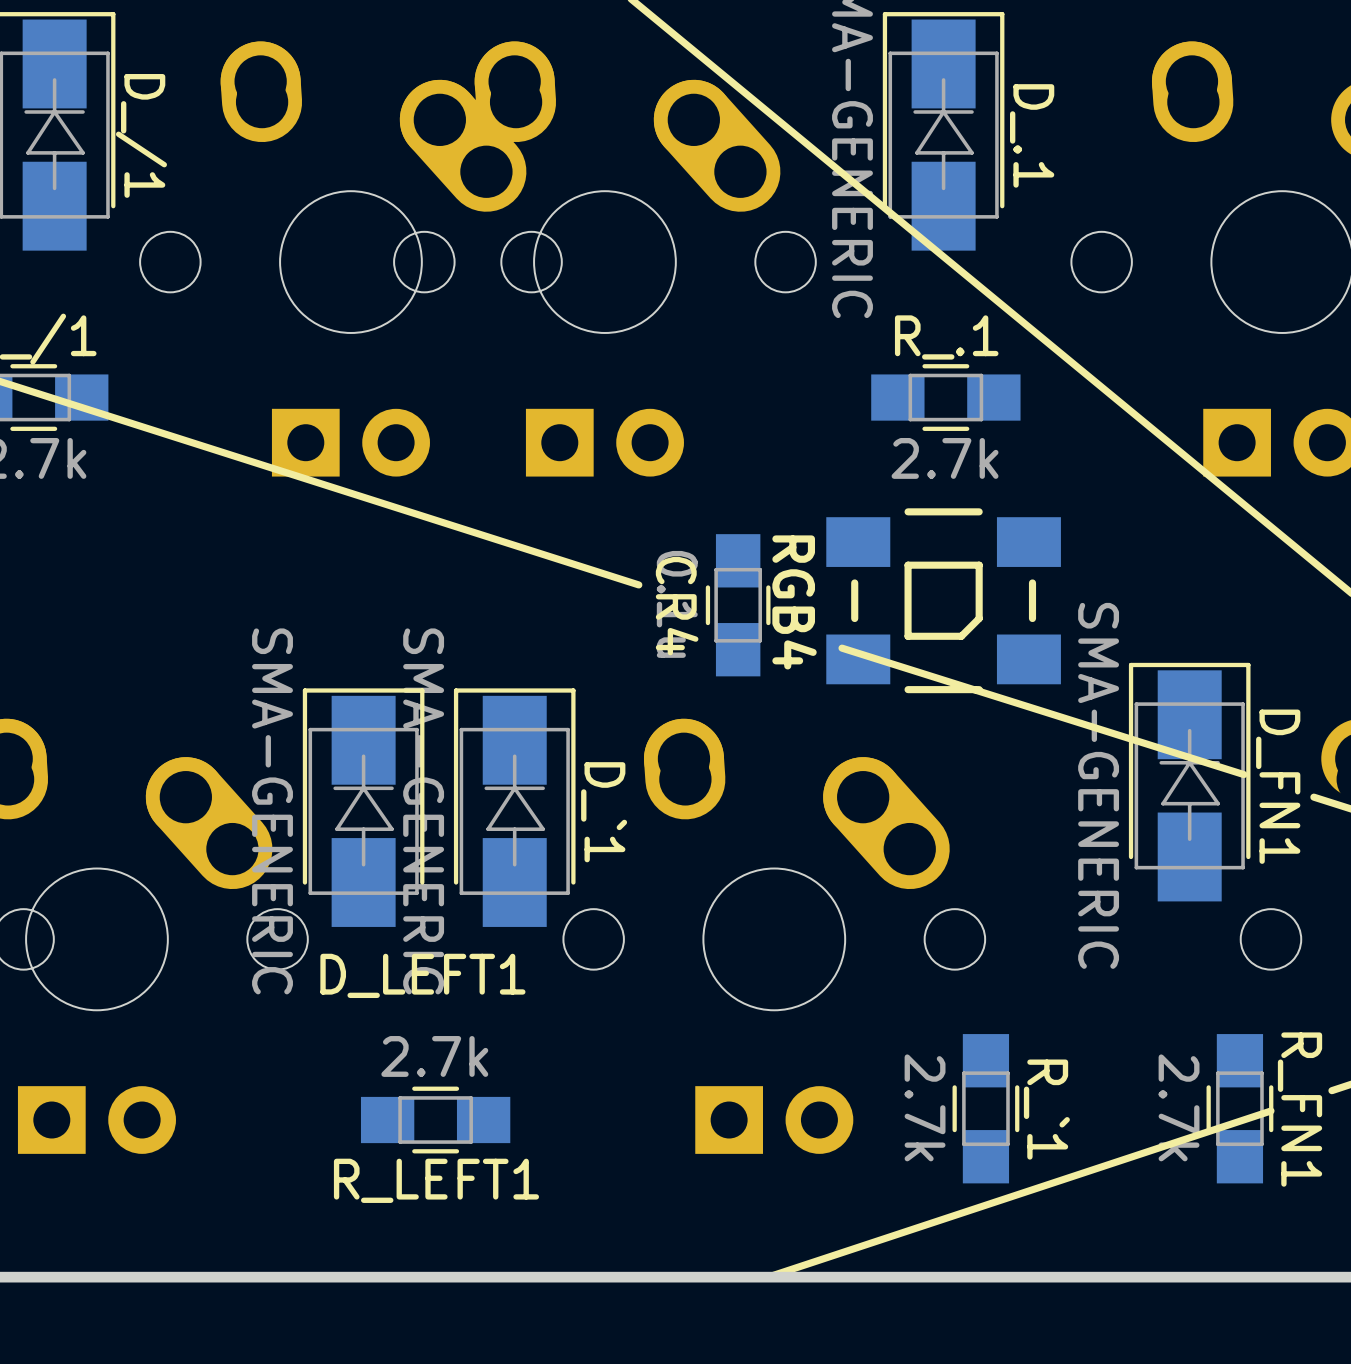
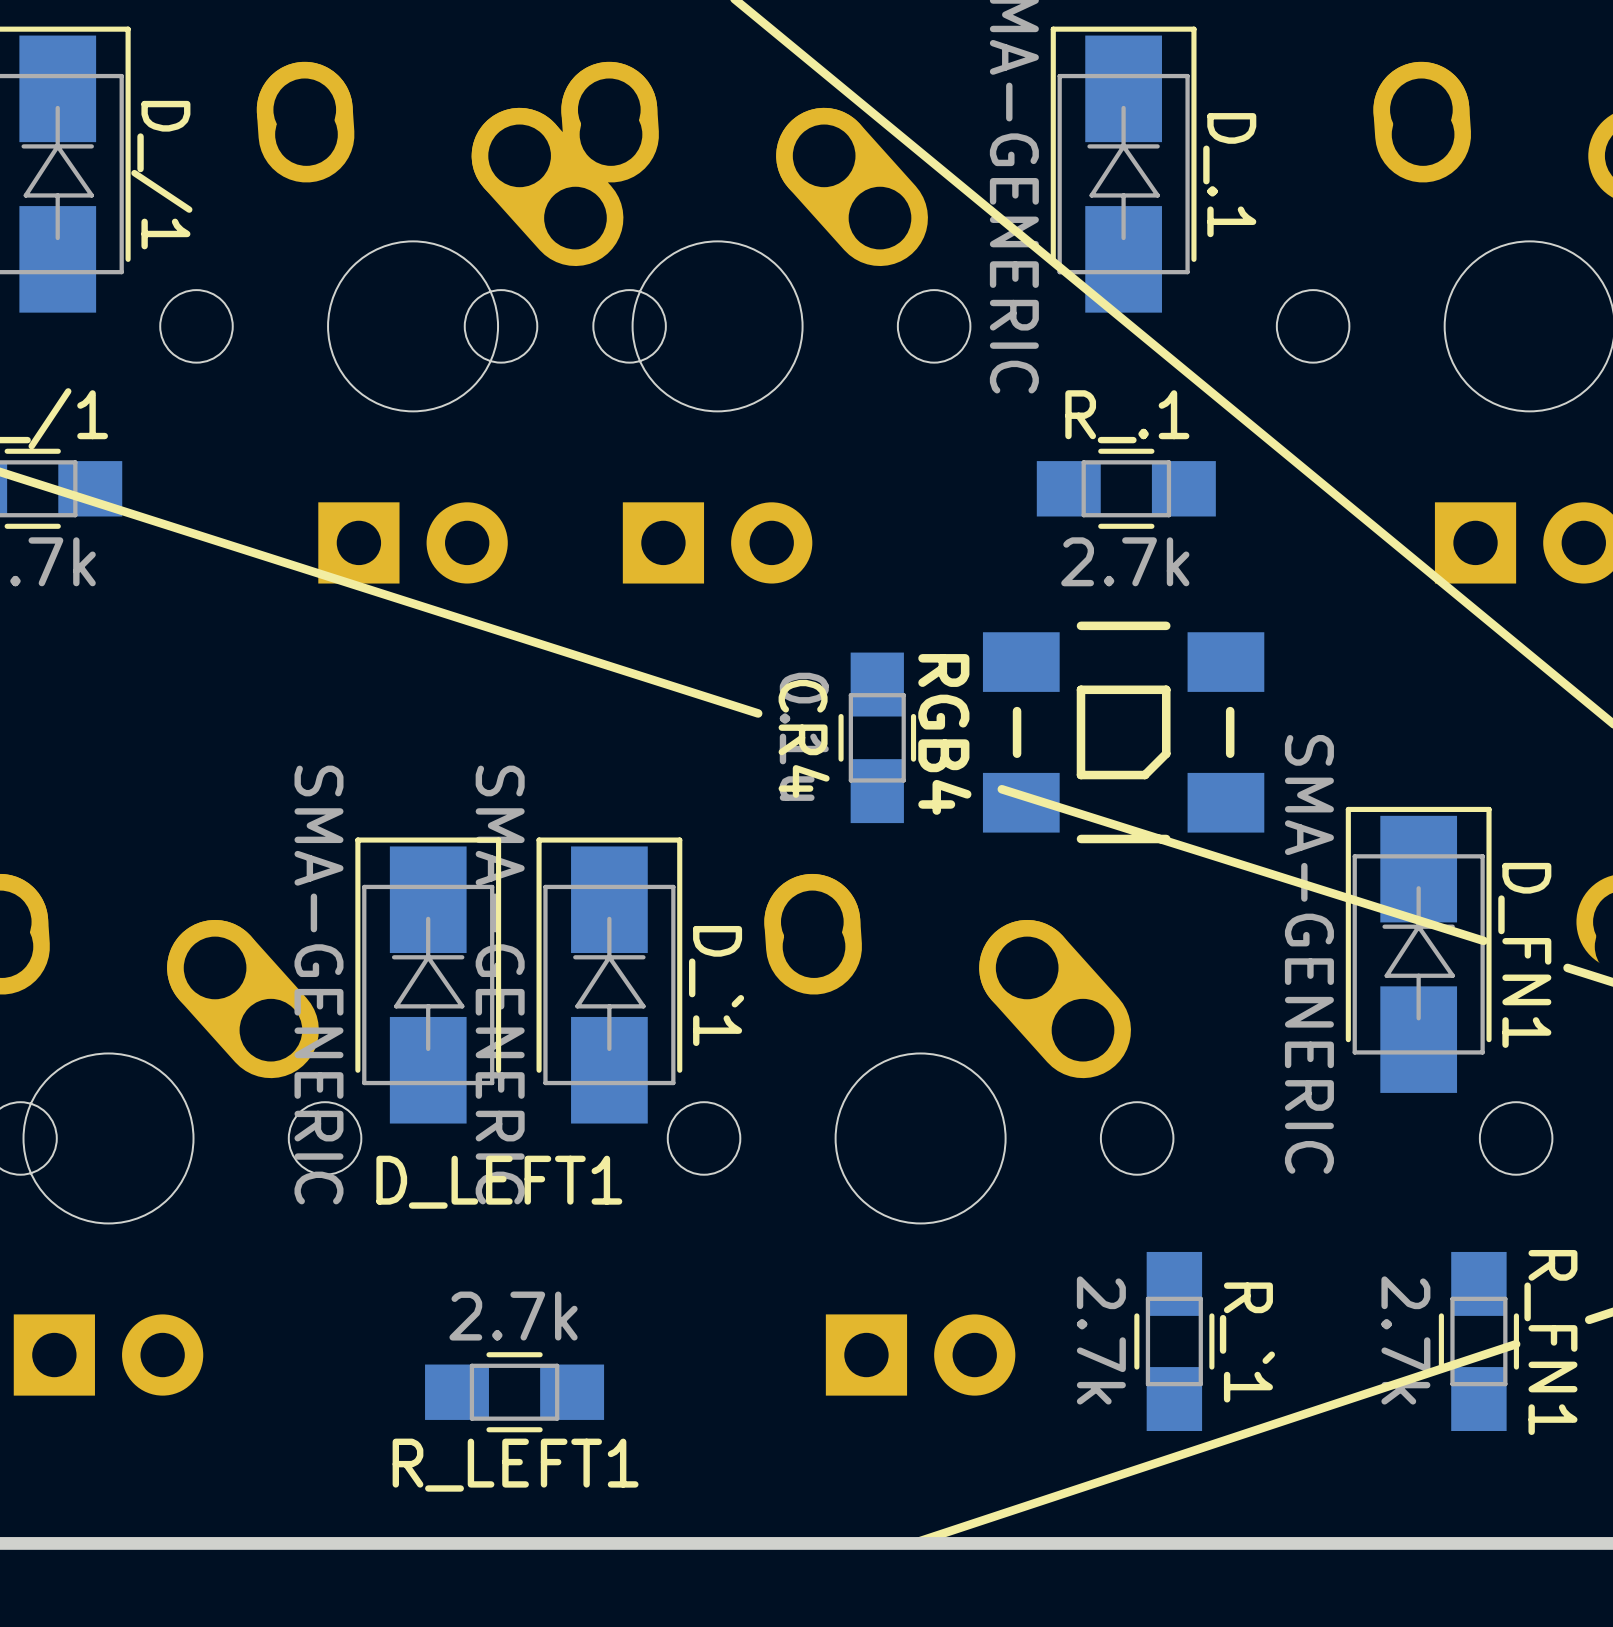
R_LEFT1 position: (435, 1120) -> (514, 1392)

